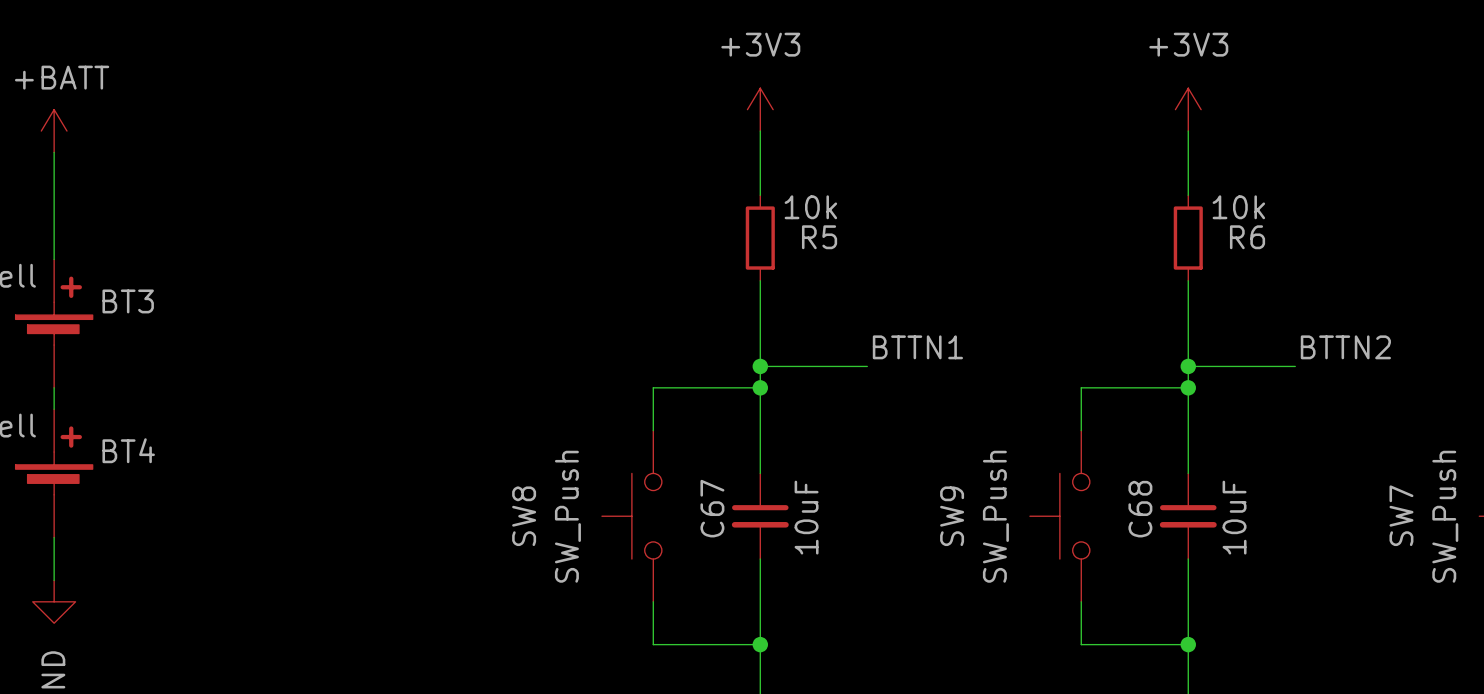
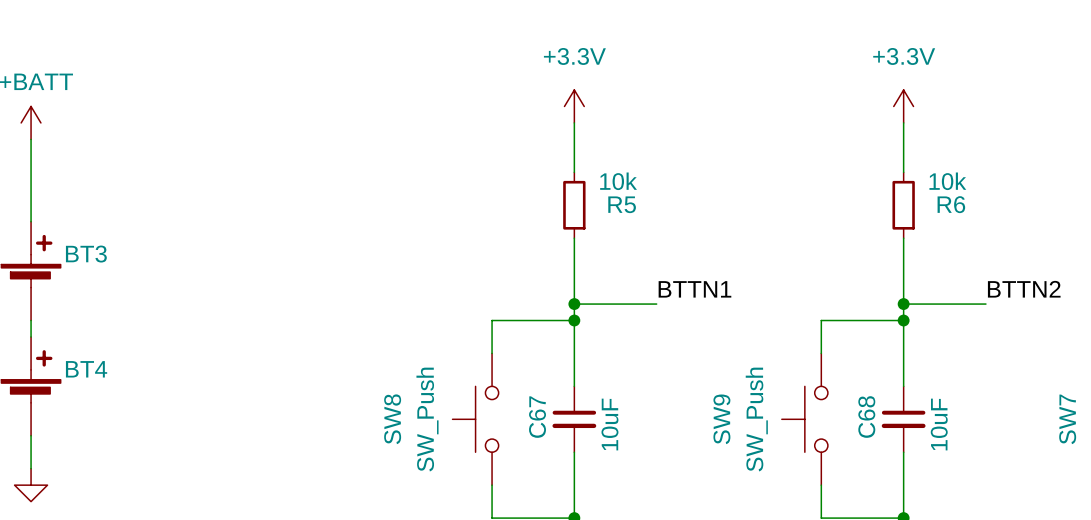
power symbol: +3V3 (760, 109) -> +3.3V (574, 106)
power symbol: +3V3 (1188, 109) -> +3.3V (903, 106)

